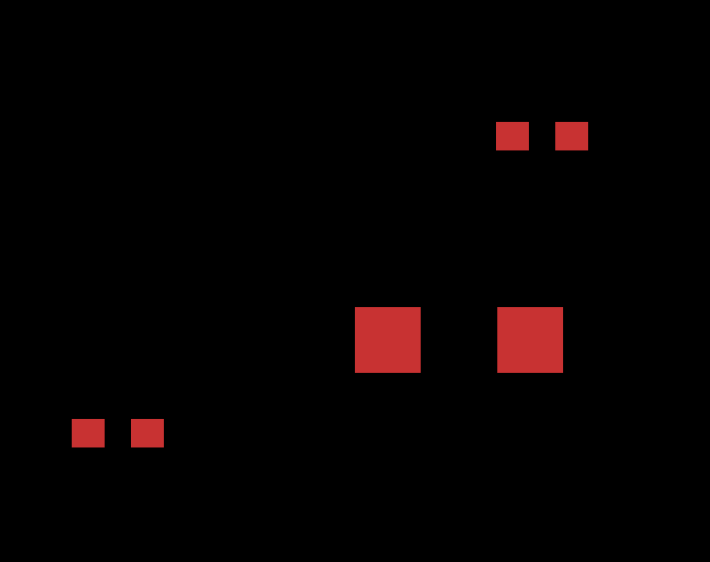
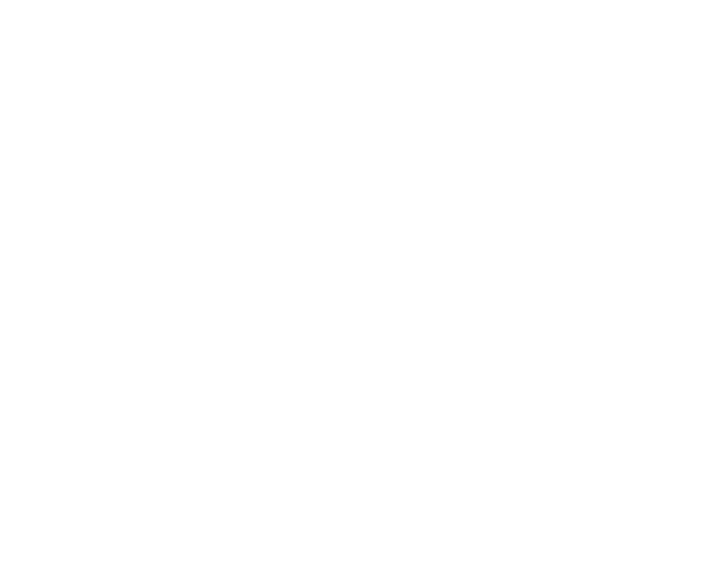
part: (542, 136) -> none
part: (387, 339) -> none
part: (530, 339) -> none
part: (117, 433) -> none

